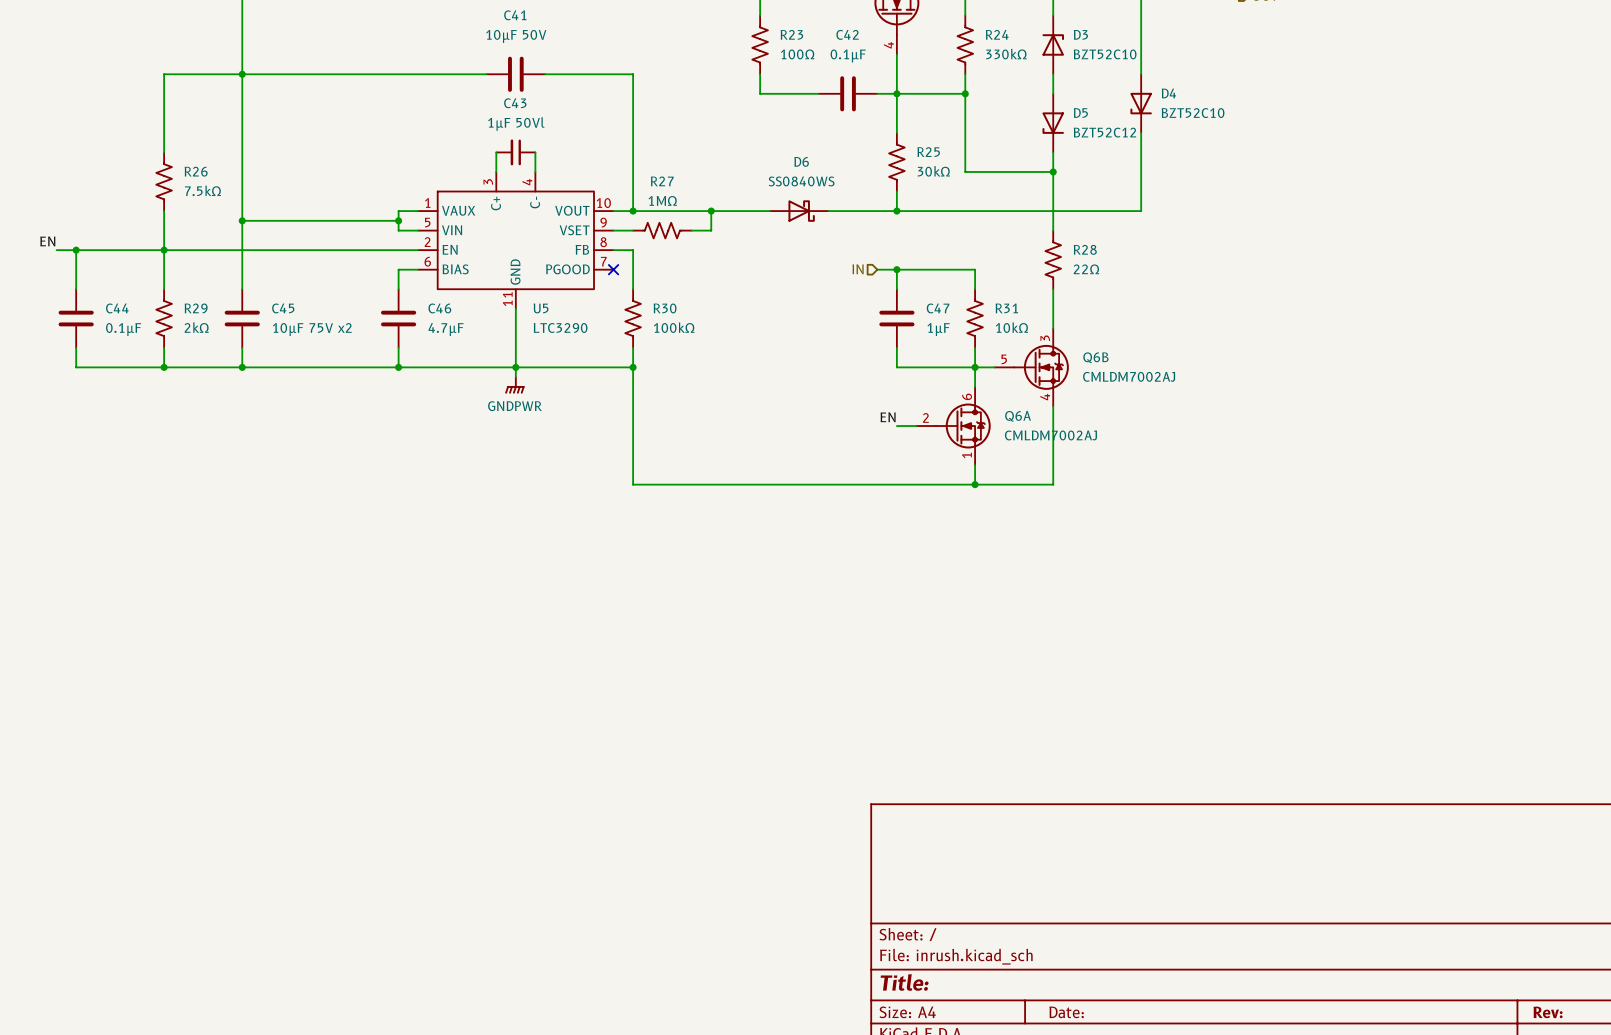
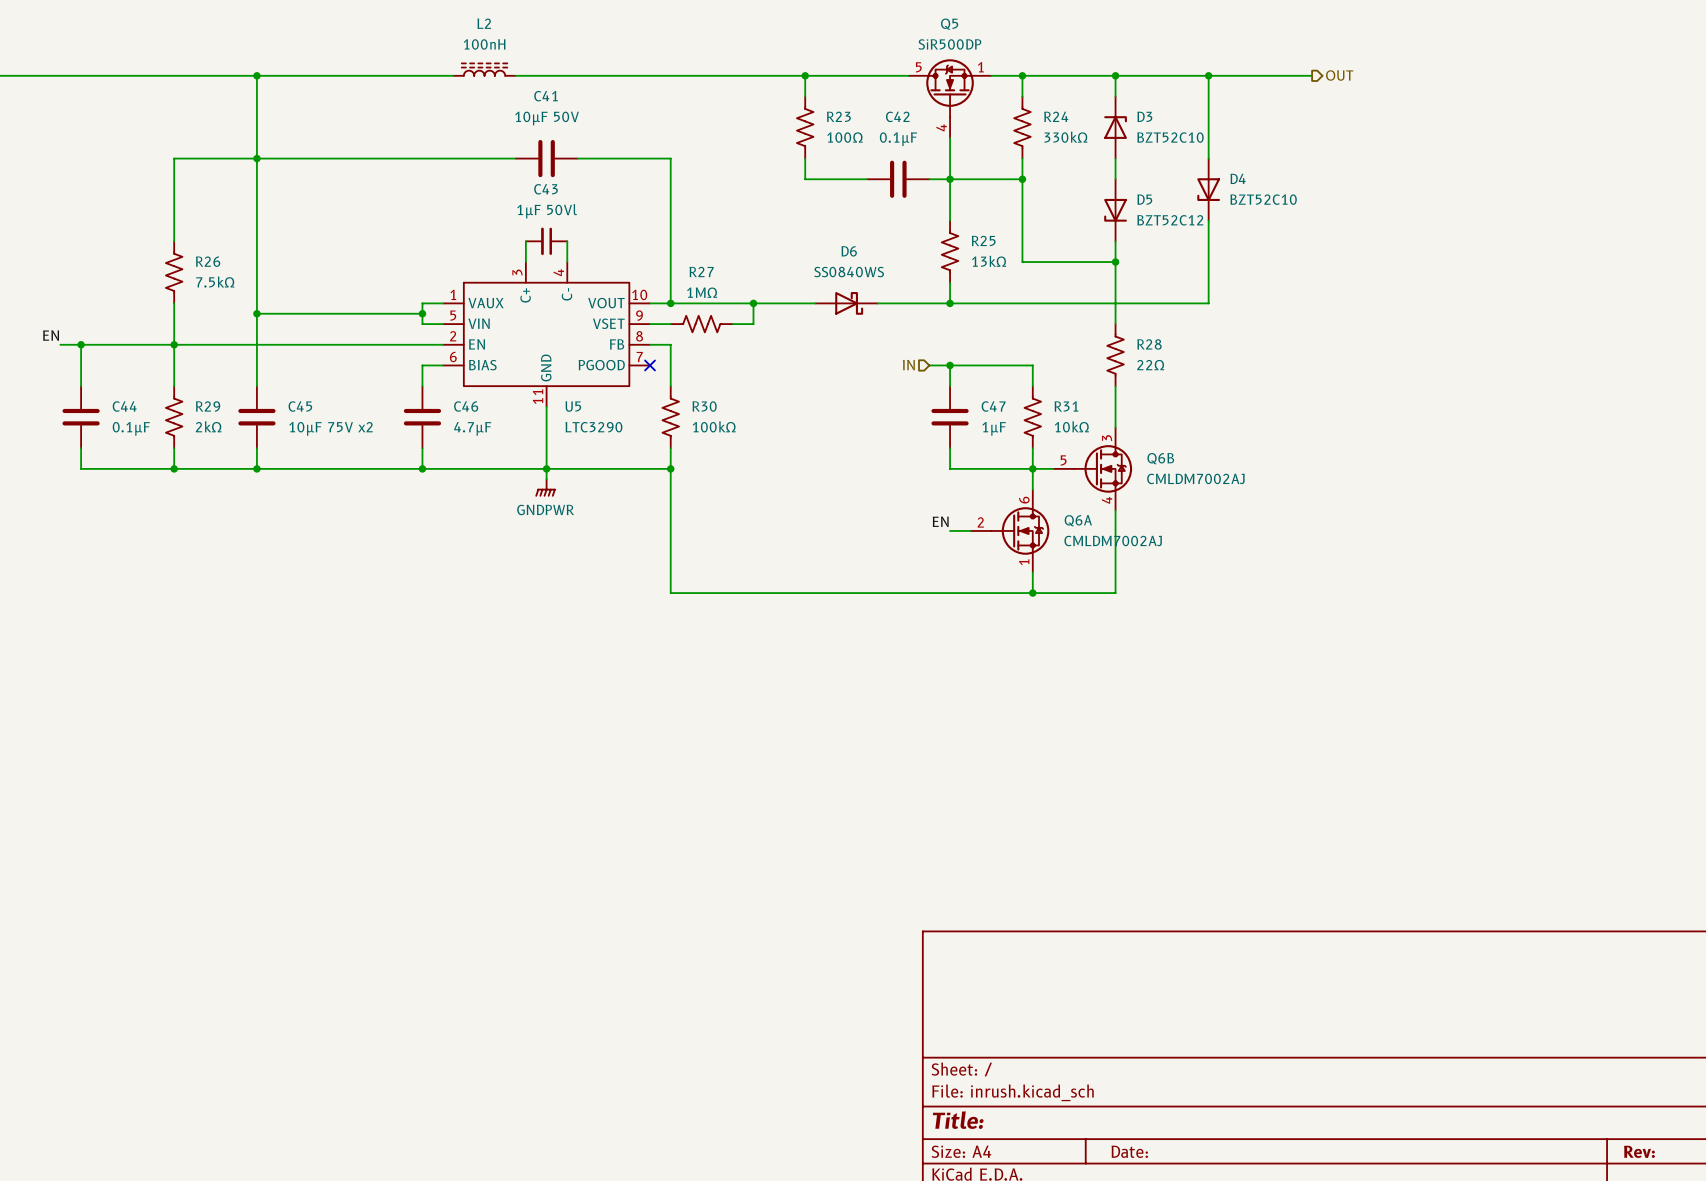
R25 value: 30kΩ (933, 171) -> 13kΩ (989, 261)

